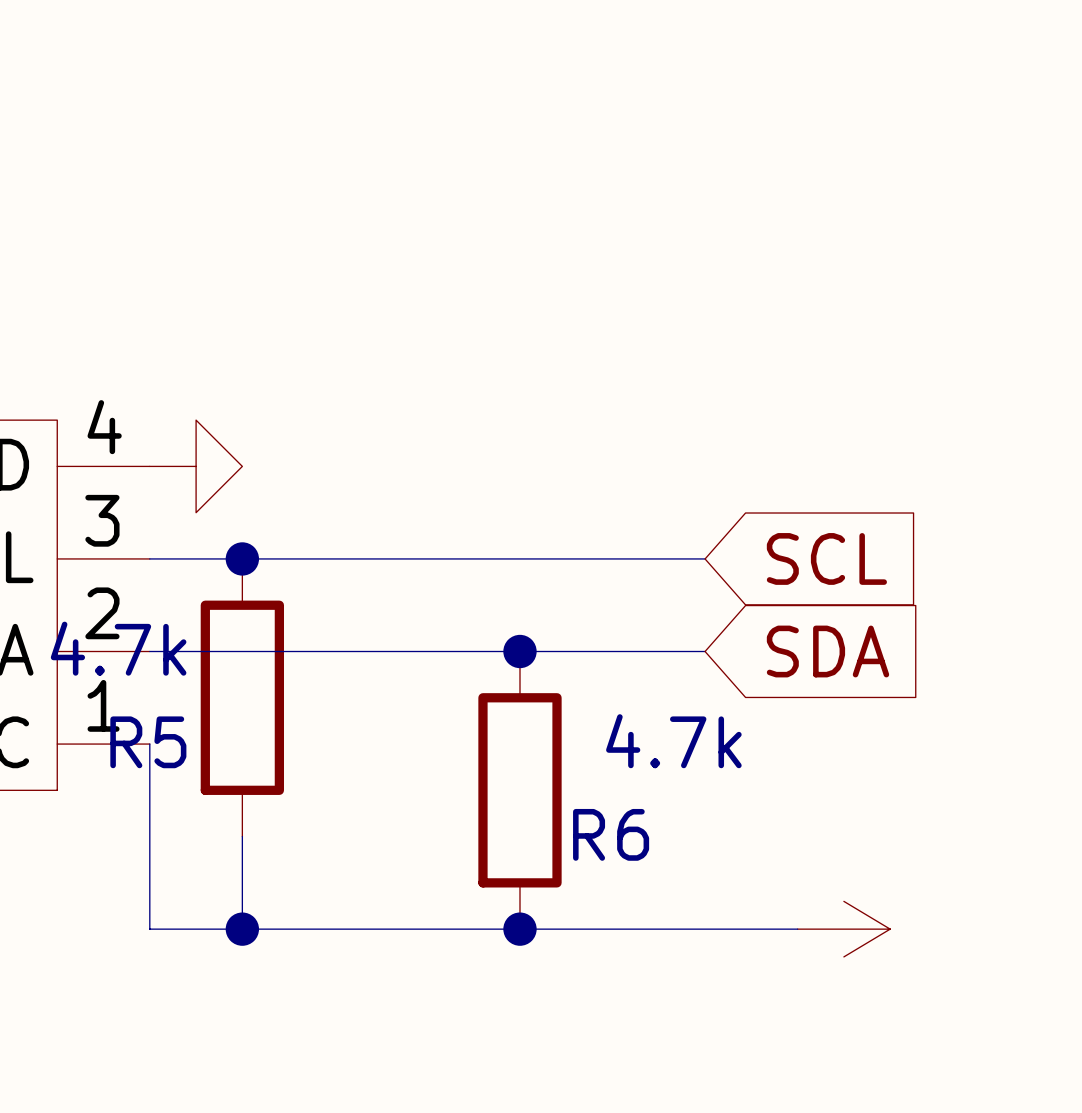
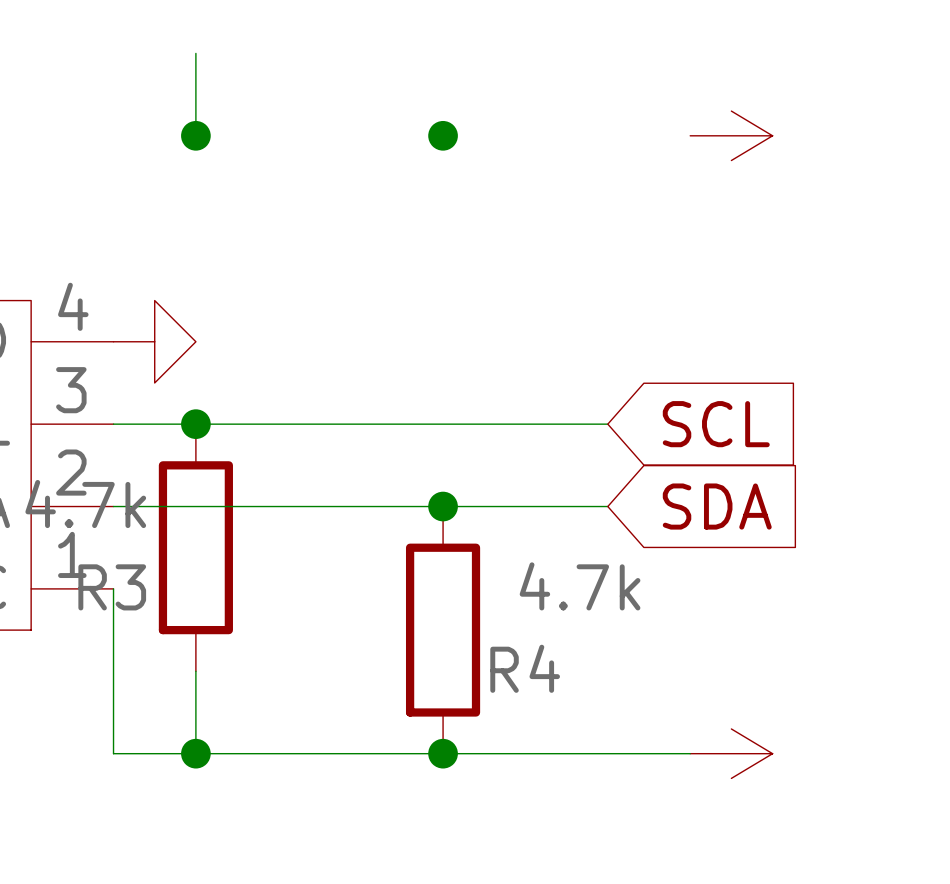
wire: none -> (195, 53) (195, 135)
junction: none -> (195, 135)
junction: none -> (443, 135)
power symbol: none -> (731, 135)
R5 name: R5 (148, 742) -> R3 (112, 587)
R6 name: R6 (611, 834) -> R4 (525, 668)

